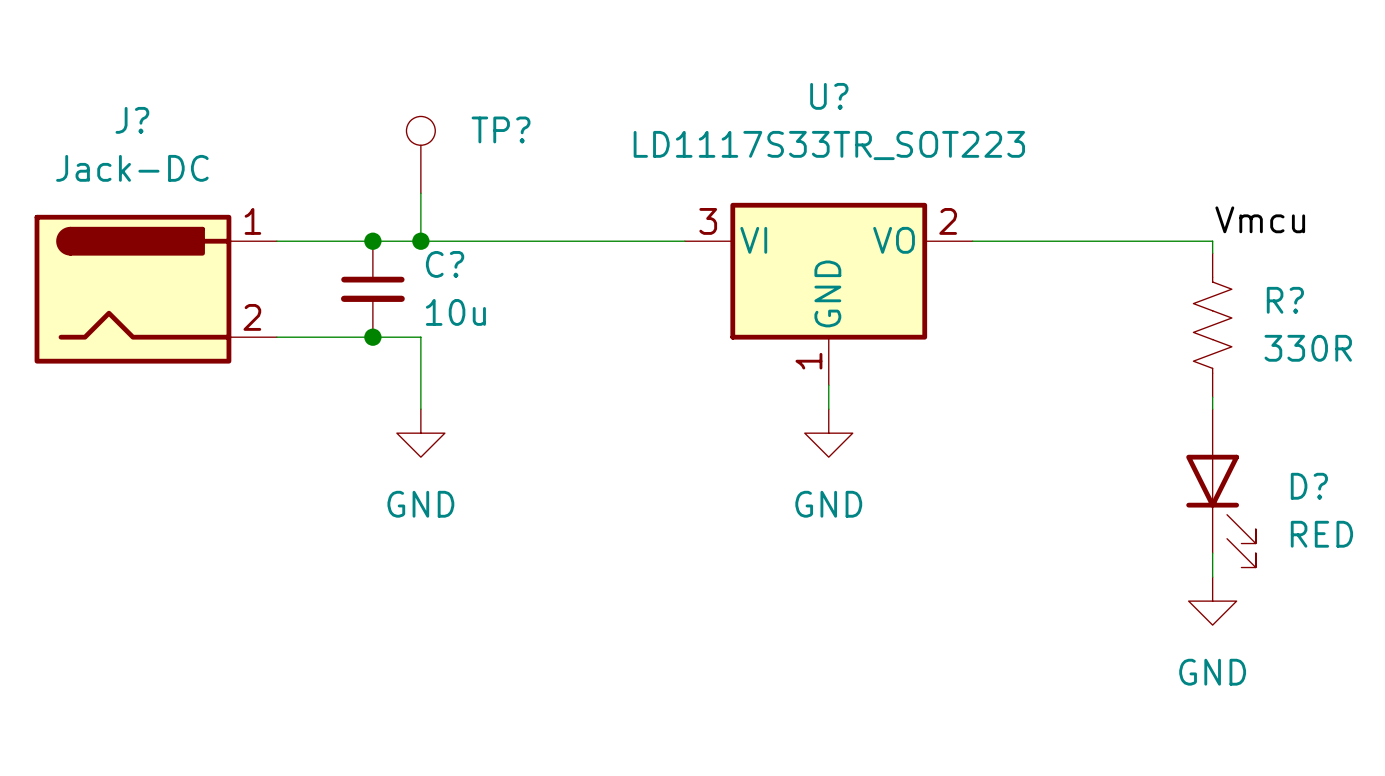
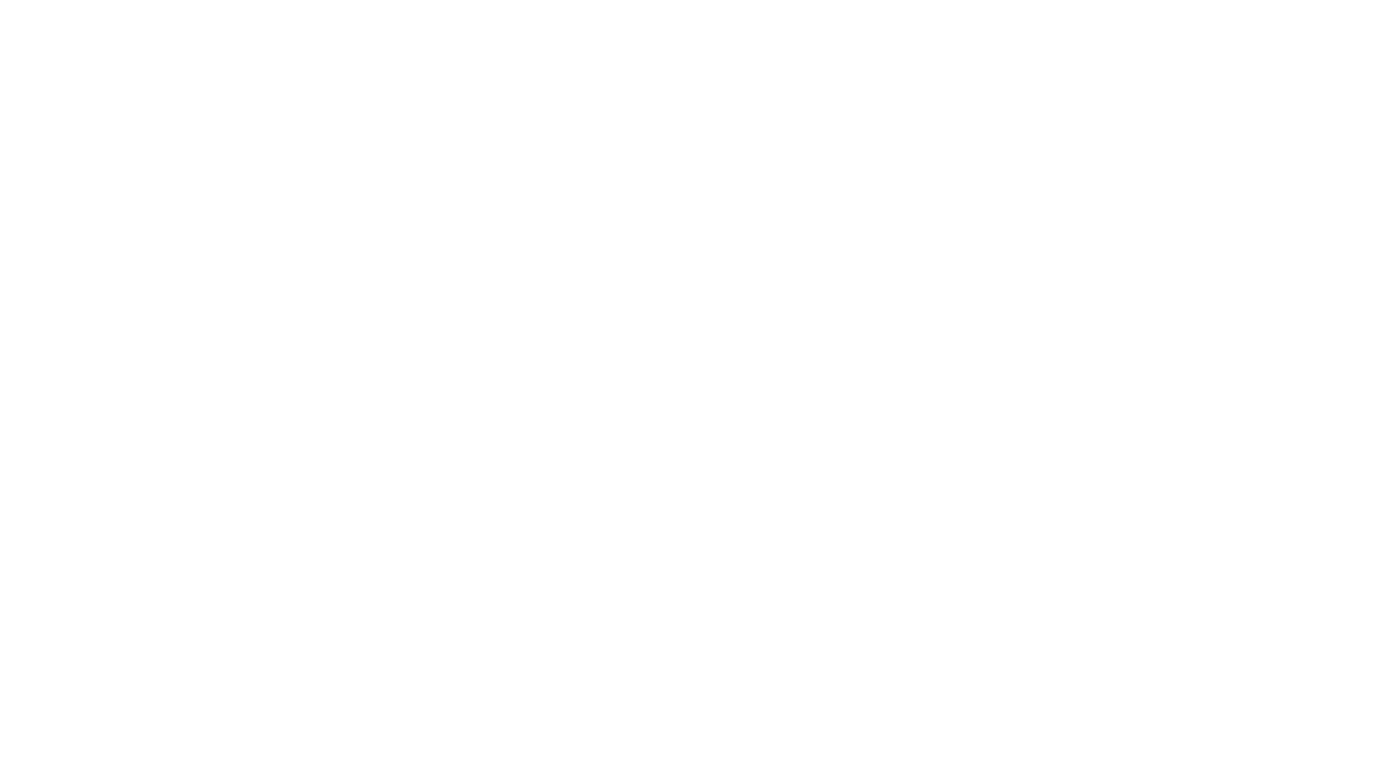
TP?: (420, 154) -> none
wire: (420, 193) (420, 241) -> none
label: Vmcu (1260, 219) -> none
wire: (276, 241) (684, 241) -> none
junction: (372, 241) -> none
junction: (420, 241) -> none
wire: (972, 241) (1212, 241) (1212, 253) -> none
J?: Jack-DC (155, 289) -> none
C?: 10u (372, 289) -> none
U?: LD1117S33TR_SOT223 (828, 294) -> none
R?: 330R (1212, 325) -> none
wire: (276, 337) (420, 337) (420, 409) -> none
junction: (372, 337) -> none
wire: (828, 385) (828, 409) -> none
wire: (1212, 397) (1212, 409) -> none
power symbol: GND (420, 433) -> none
power symbol: GND (828, 433) -> none
D?: RED (1221, 488) -> none
wire: (1212, 553) (1212, 577) -> none
power symbol: GND (1212, 601) -> none

